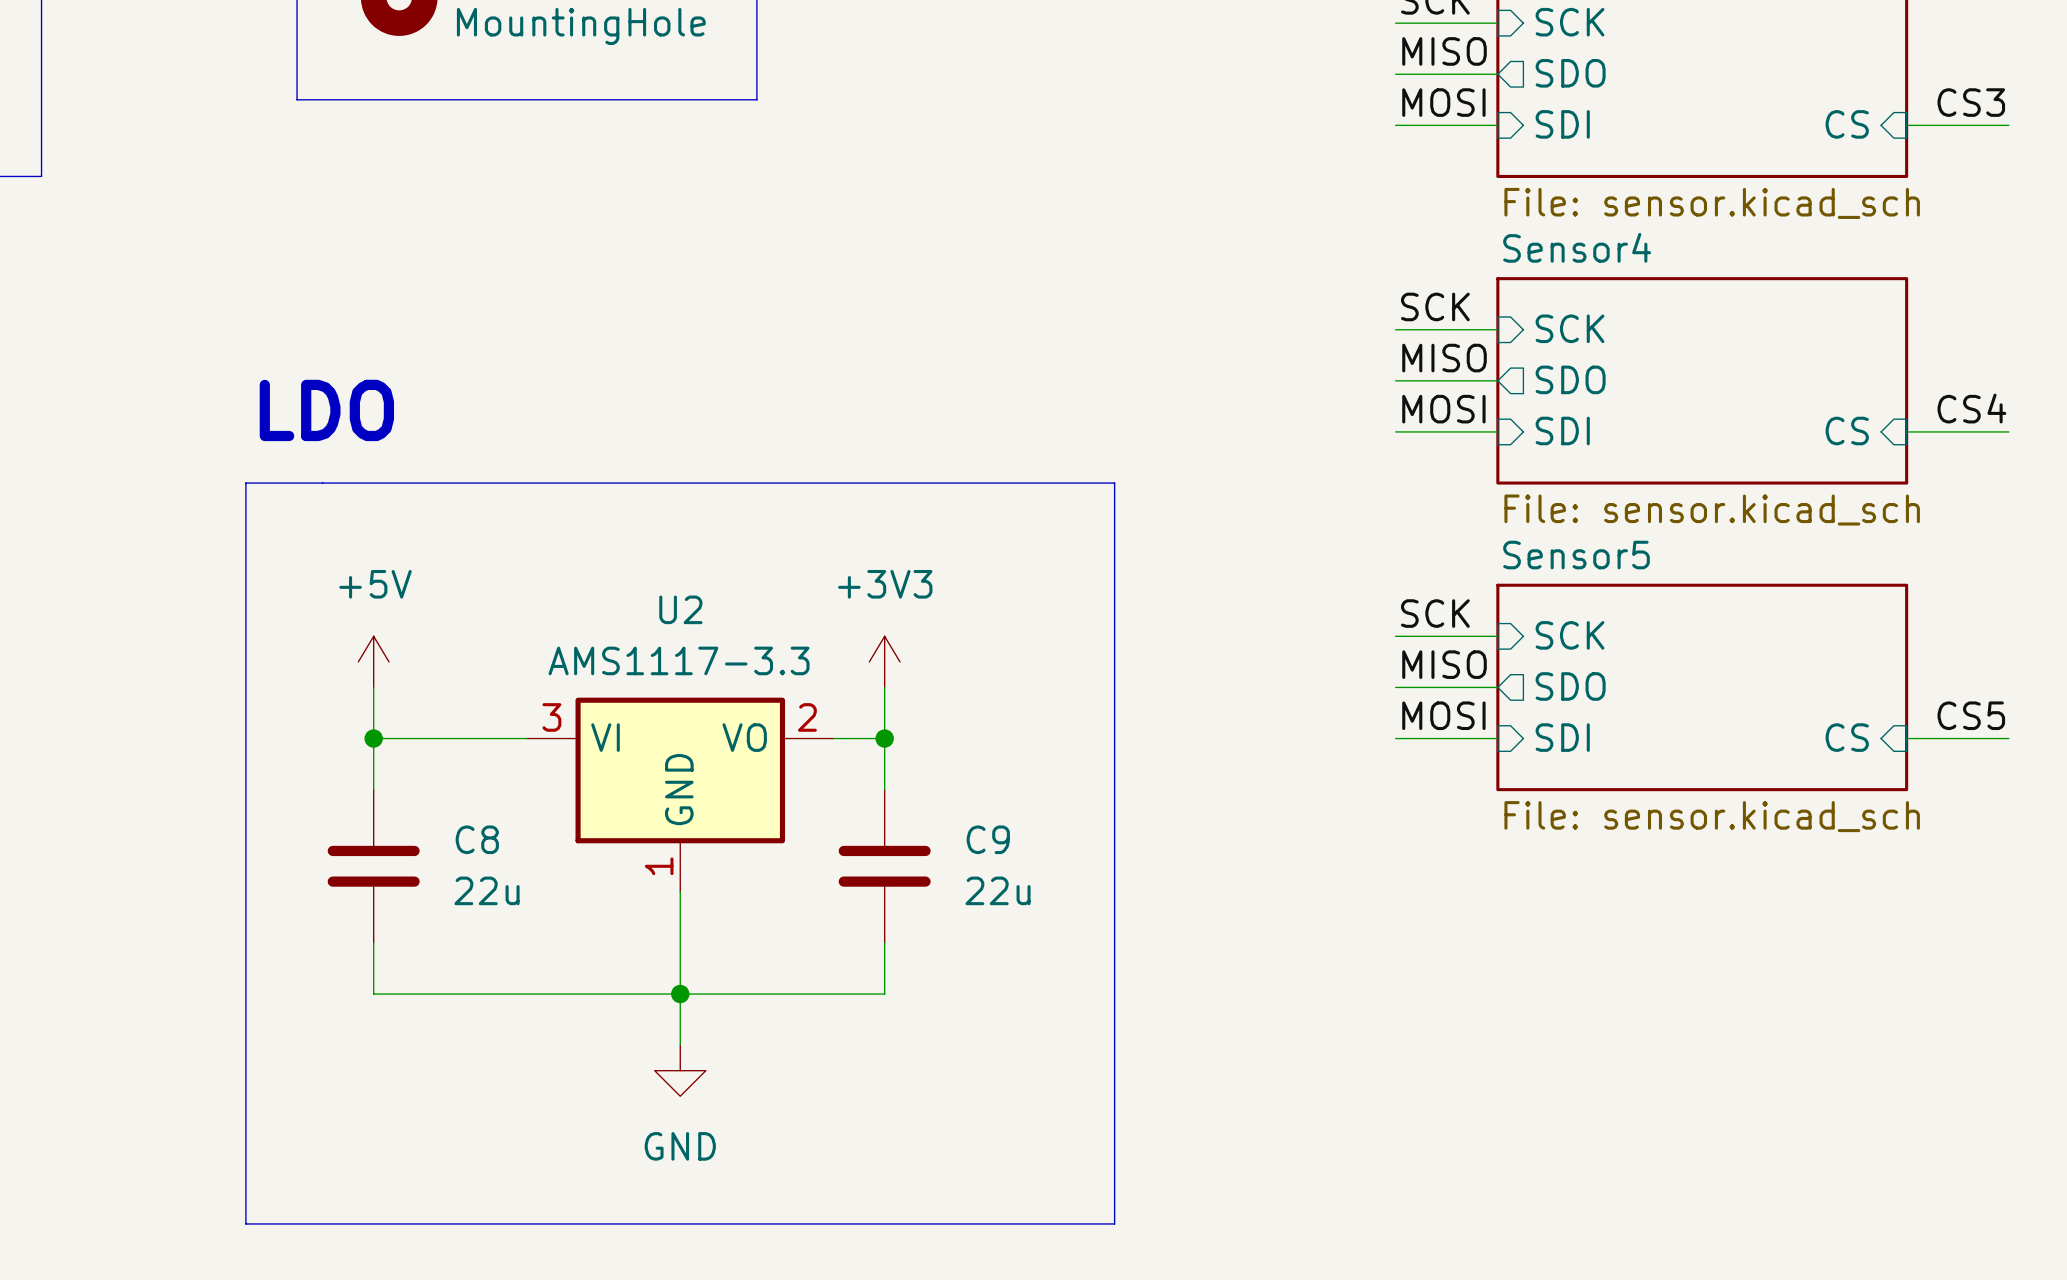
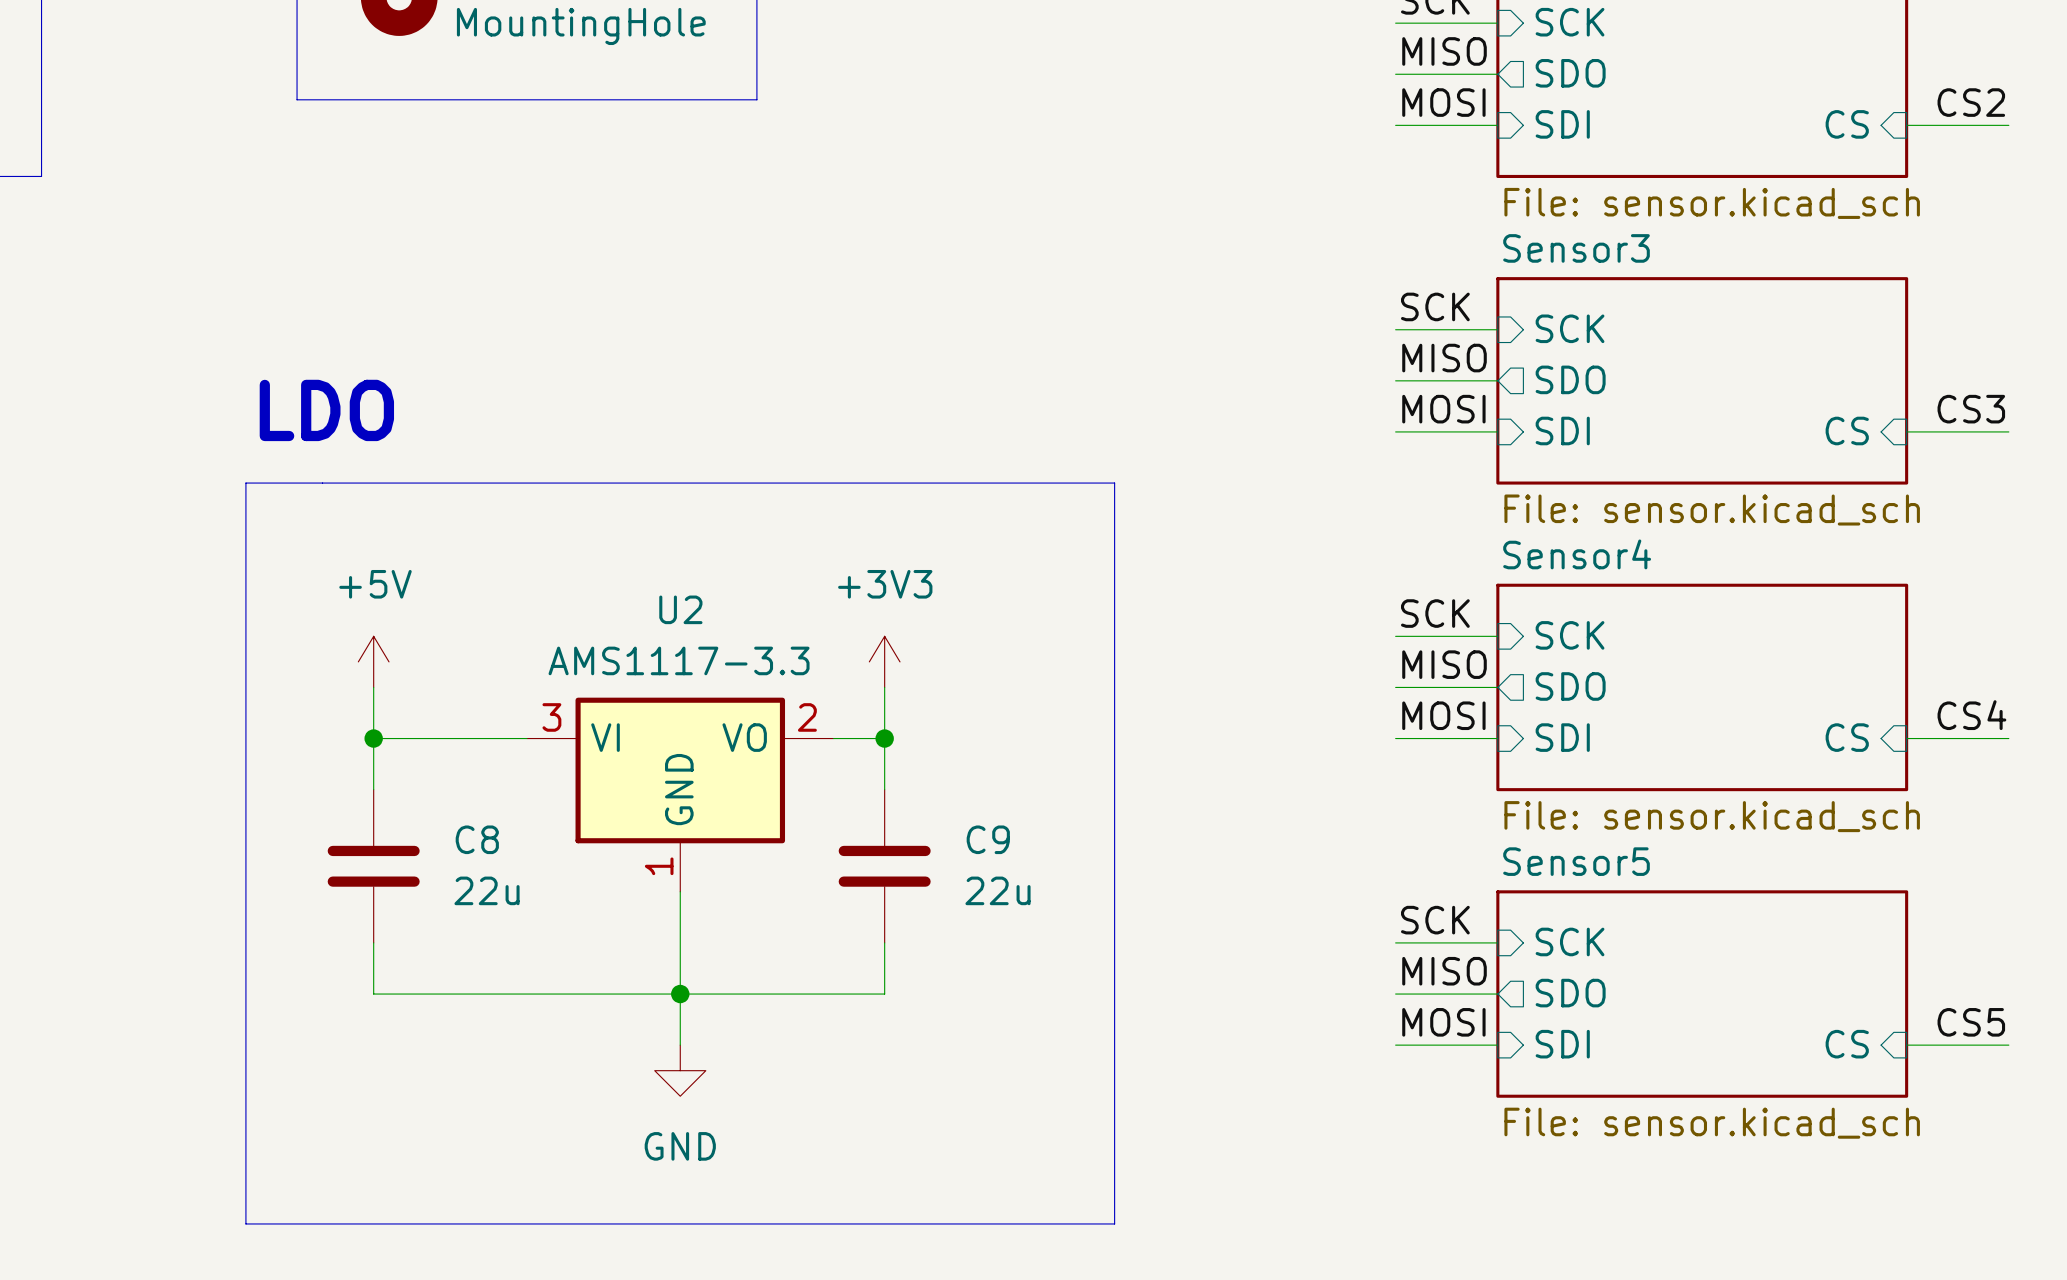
label: CS3 (1971, 102) -> CS2 (1971, 102)
sheet Sensor4 name: Sensor4 (1577, 247) -> Sensor3 (1576, 248)
label: CS4 (1971, 408) -> CS3 (1971, 409)
sheet Sensor5 name: Sensor5 (1576, 555) -> Sensor4 (1577, 554)
label: CS5 (1971, 715) -> CS4 (1971, 715)
label: none -> SCK (1435, 920)
sheet pin: none -> SCK (1570, 941)
wire: none -> (1395, 942) (1497, 942)
label: none -> MISO (1444, 971)
sheet pin: none -> SDO (1570, 993)
wire: none -> (1395, 994) (1497, 994)
sheet Sensor5: none -> File: sensor.kicad_sch (1702, 994)
label: none -> MOSI (1443, 1022)
label: none -> CS5 (1971, 1022)
sheet pin: none -> SDI (1562, 1044)
sheet pin: none -> CS (1847, 1044)
wire: none -> (1395, 1045) (1497, 1045)
wire: none -> (1906, 1045) (2008, 1045)

